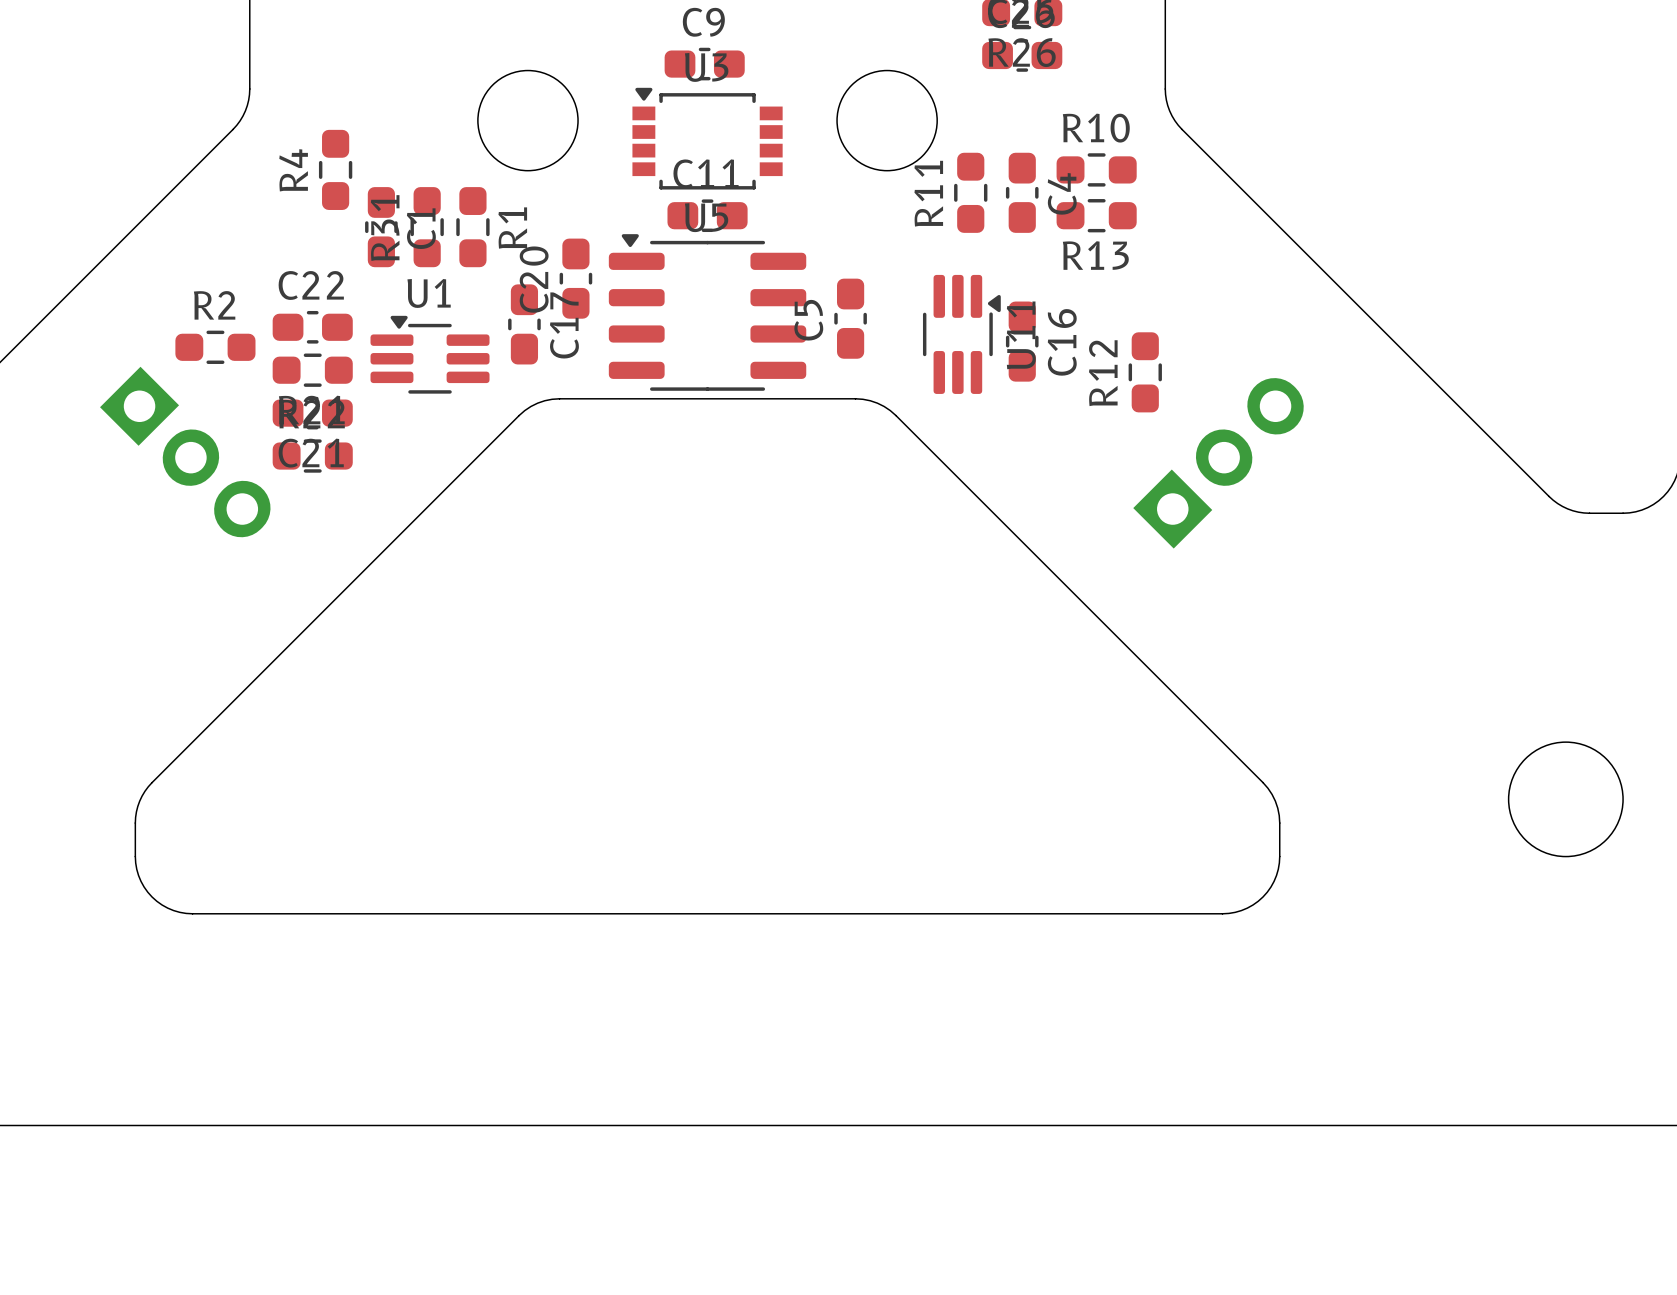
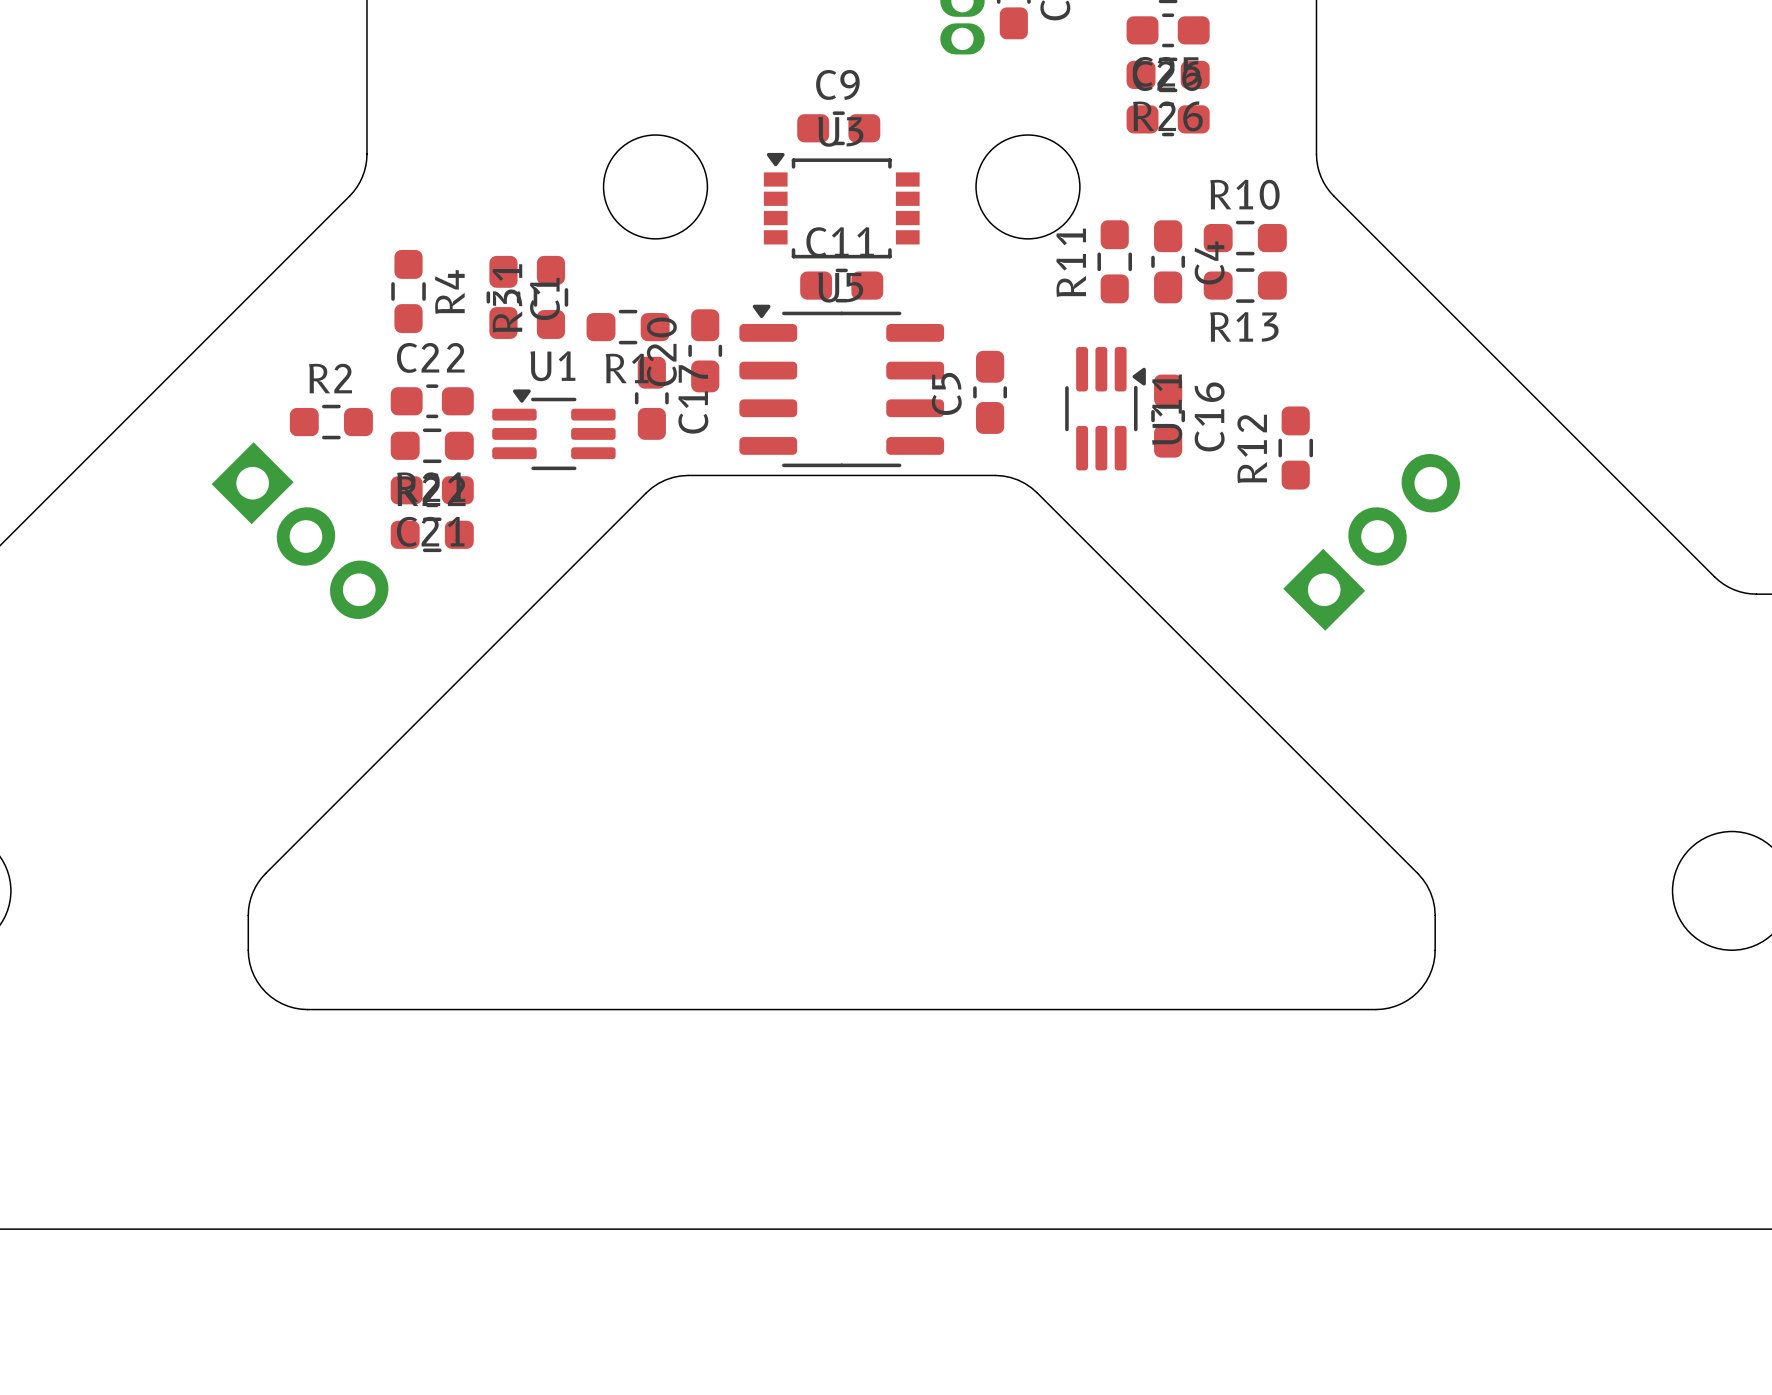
R4 position: (335, 169) -> (408, 291)
R4 name position: R4 (293, 170) -> R4 (449, 291)
R1 rotation: 0° (472, 227) -> 90° clockwise (628, 327)

